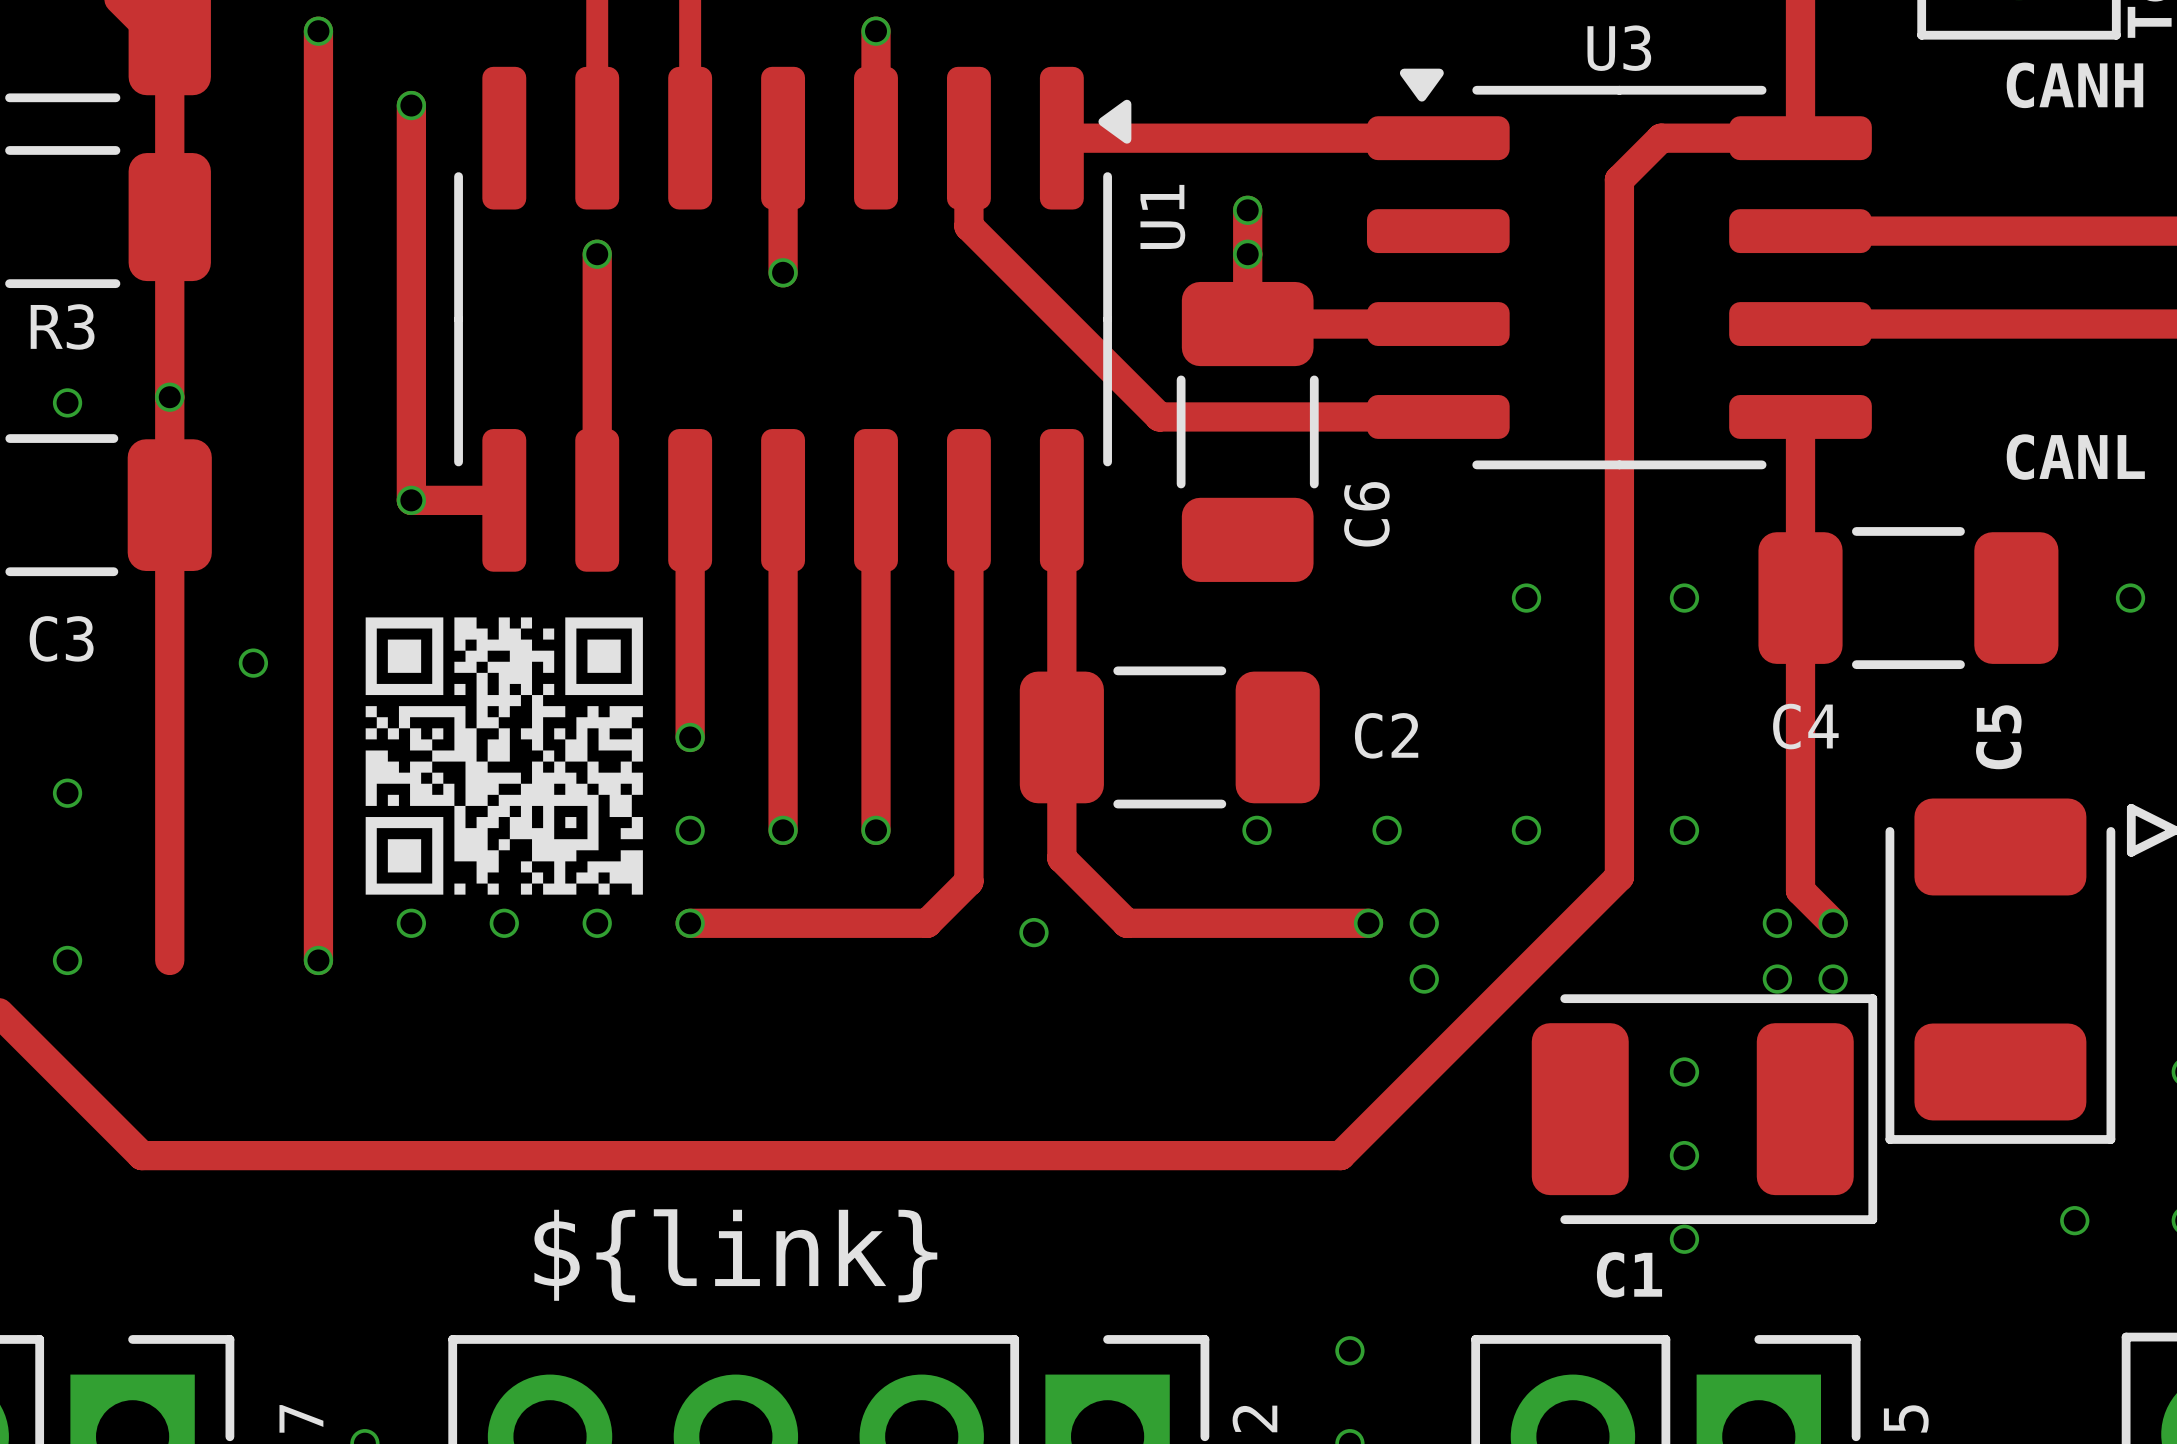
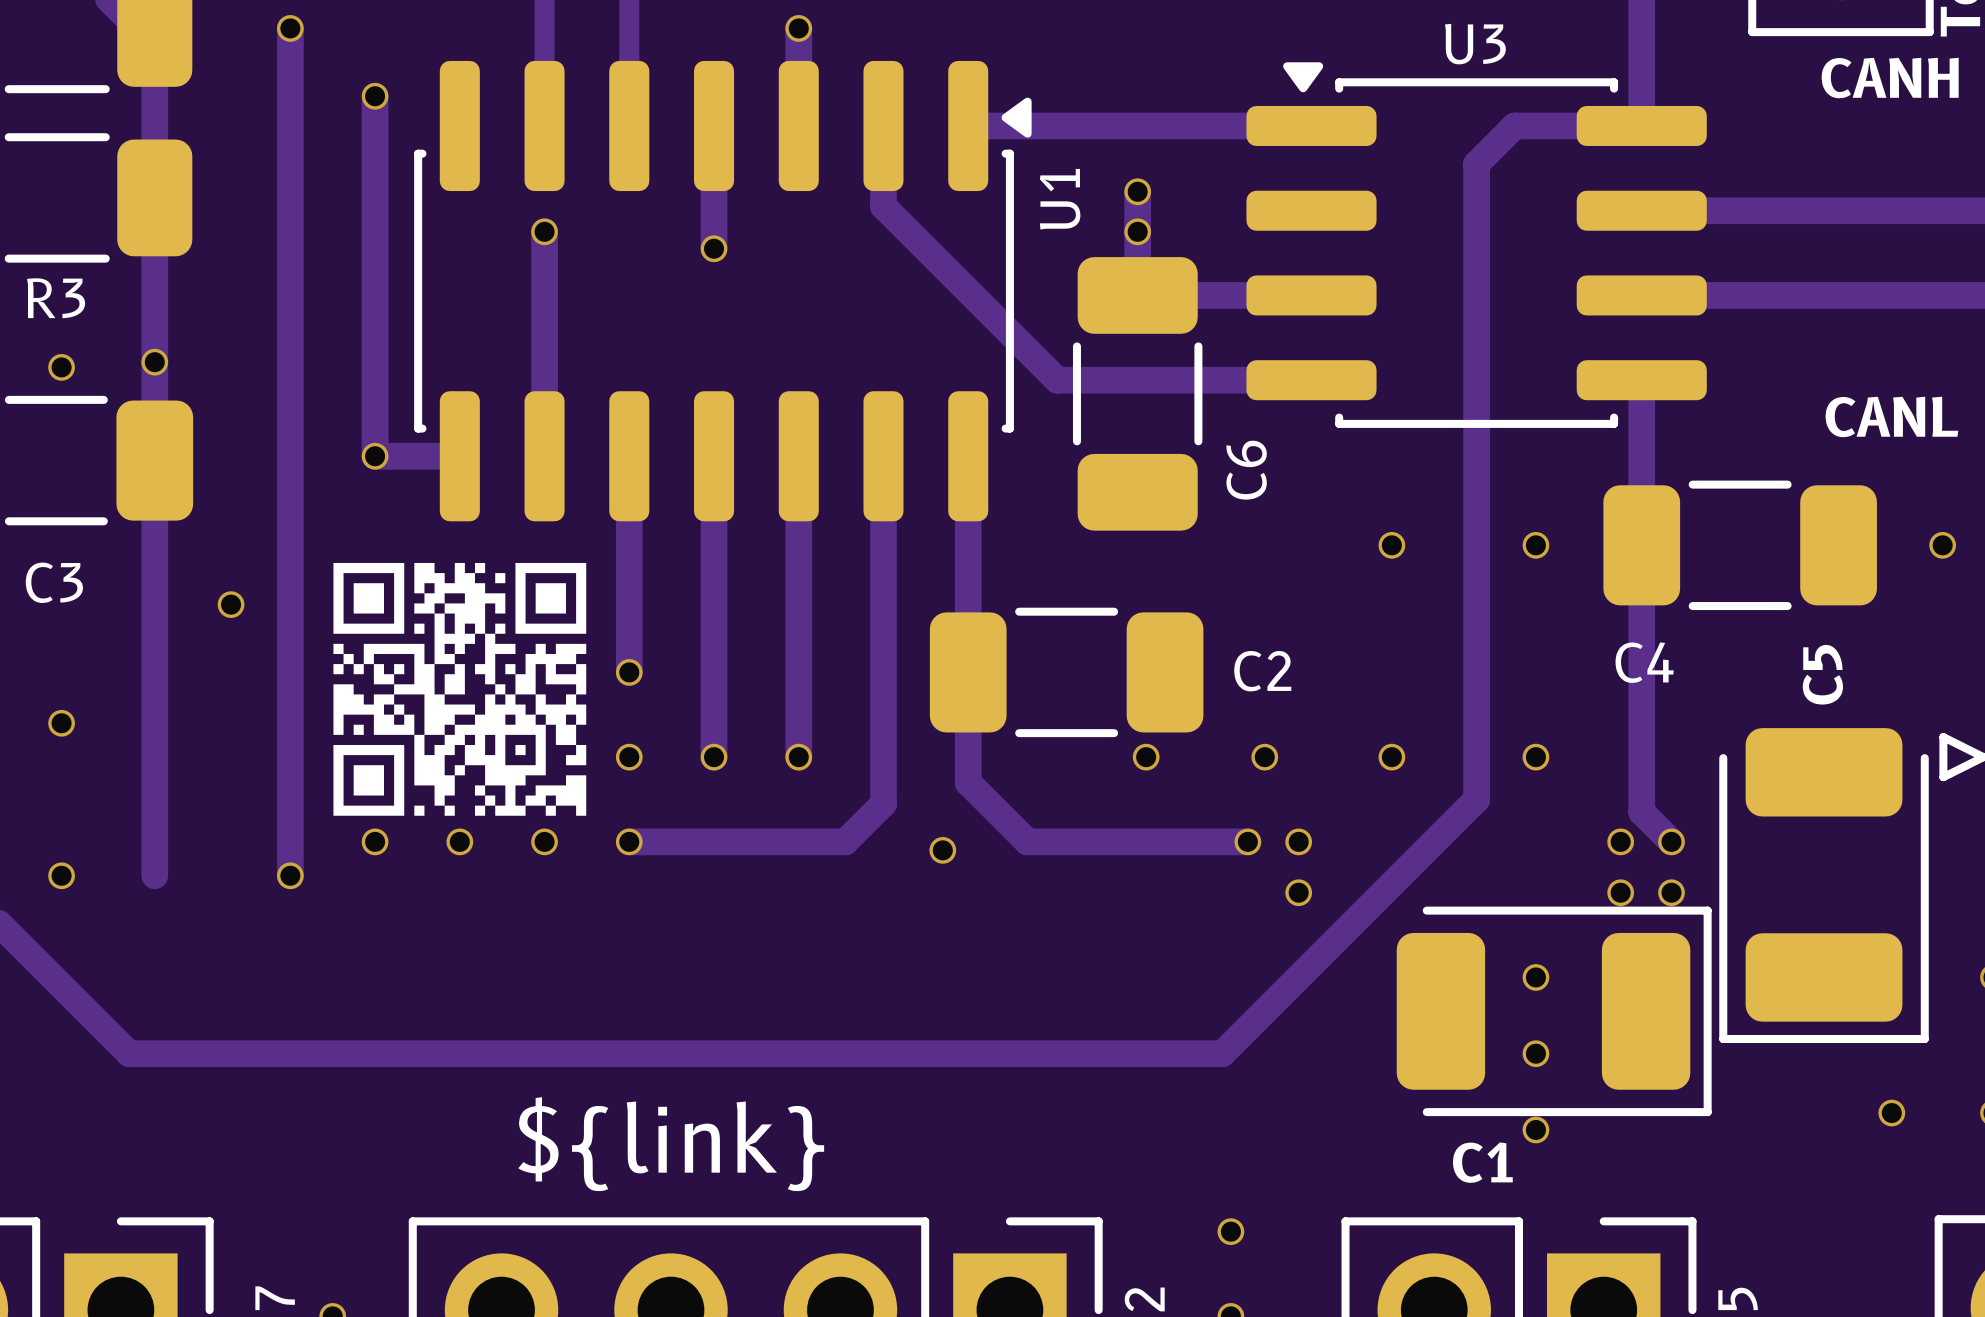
U1 footprint: [454, 66, 1132, 572] -> [414, 60, 1032, 522]
U3 footprint: [1366, 68, 1872, 470] -> [1246, 62, 1707, 428]

